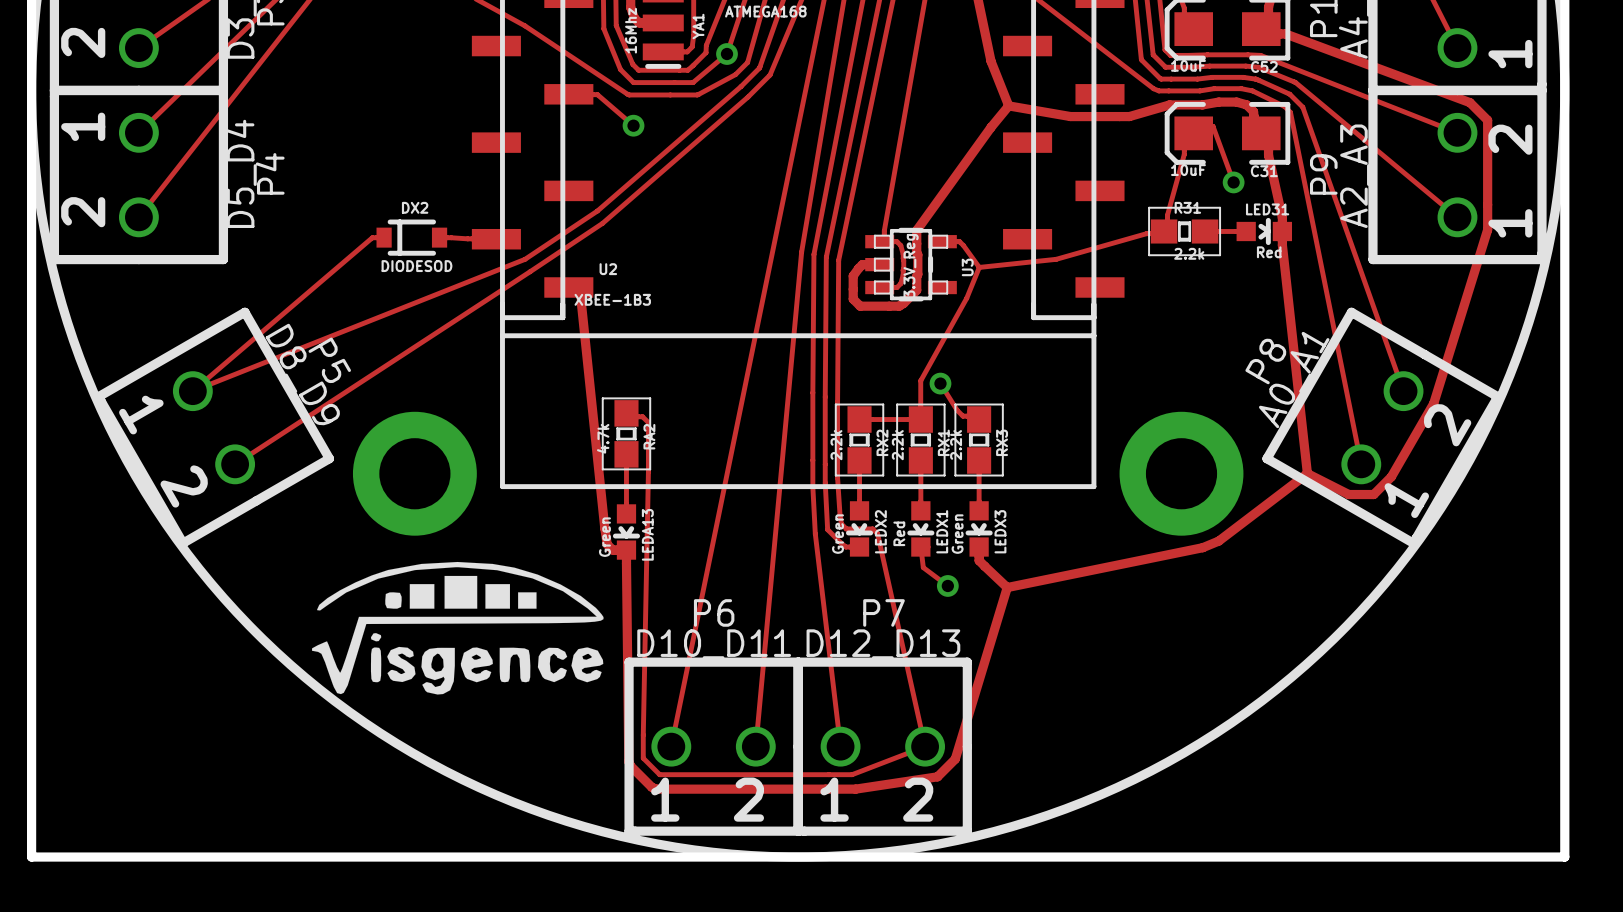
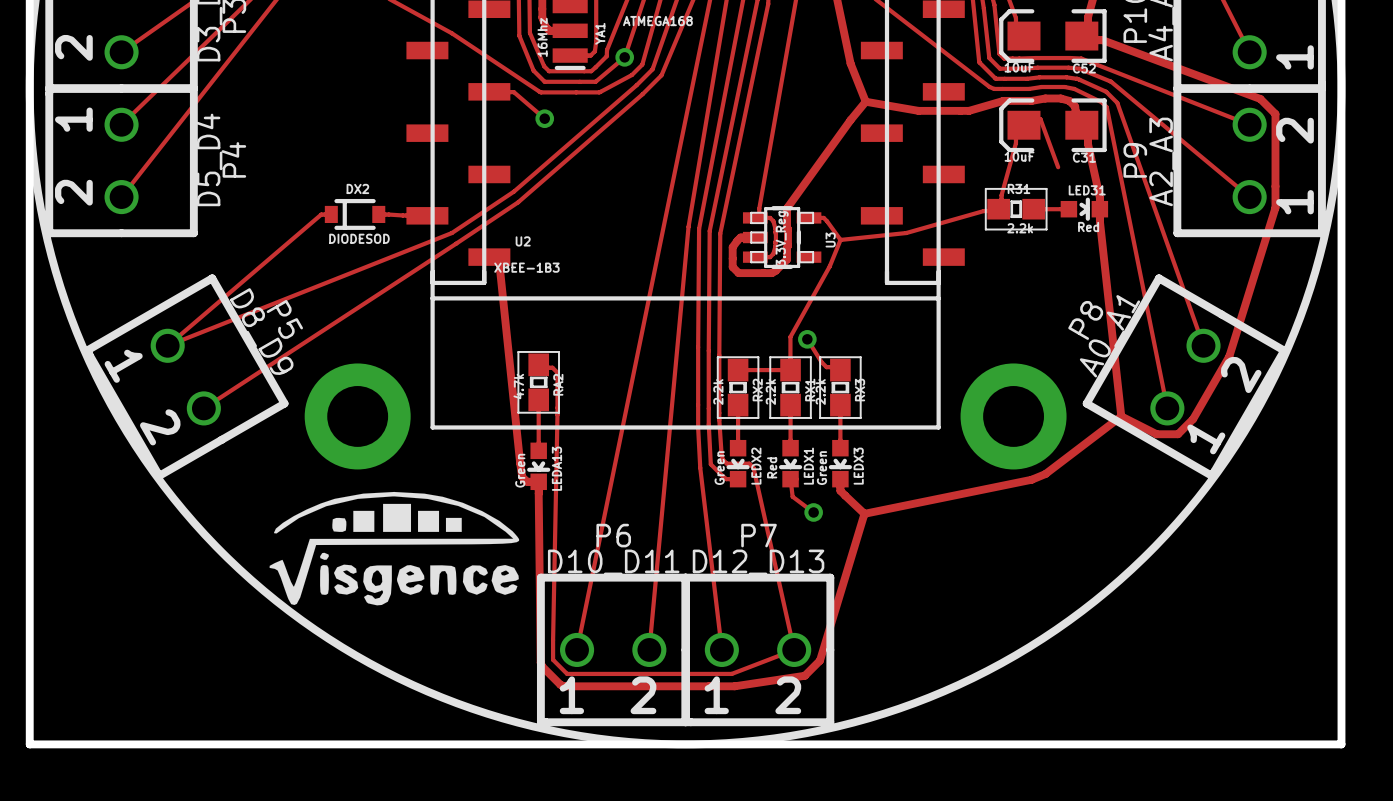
via: (1233, 182) -> none

